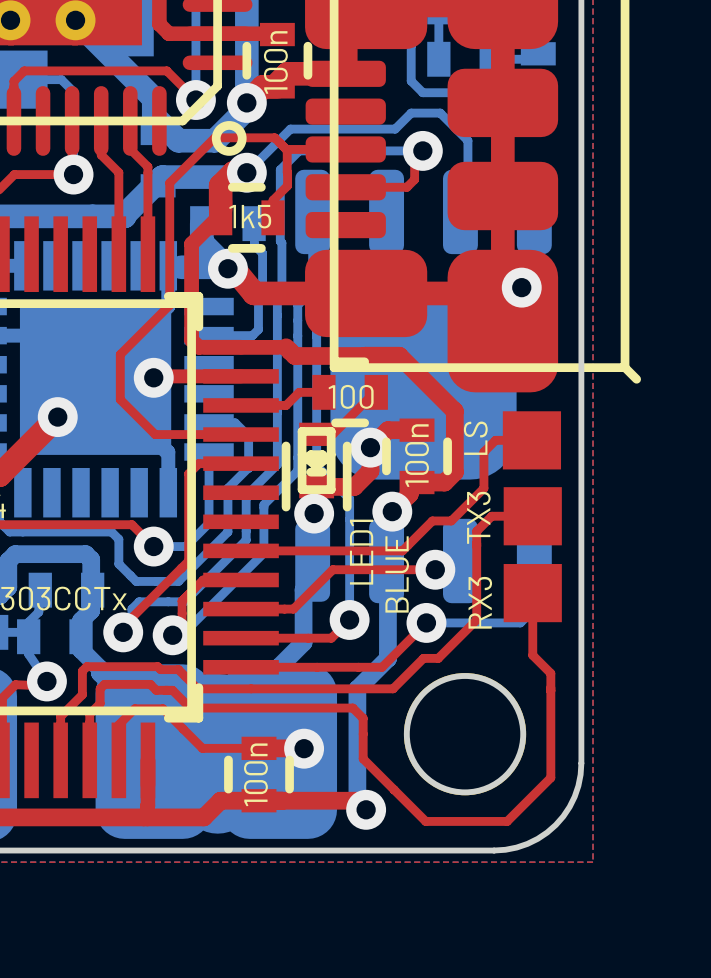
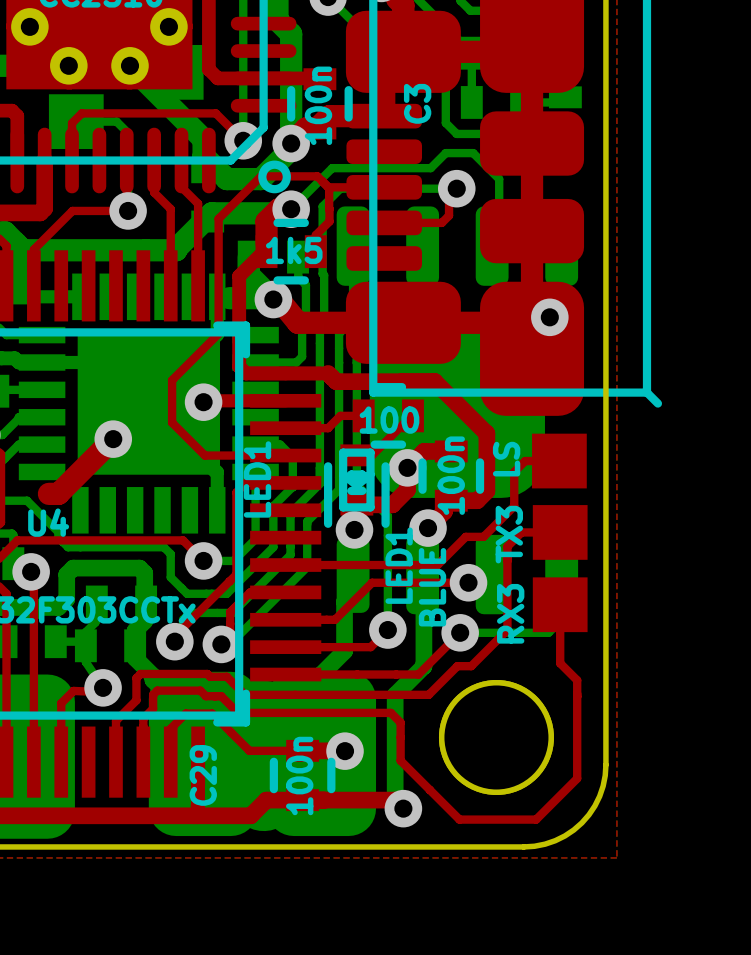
C3 name: none -> C3 (417, 103)
LED1 name: none -> LED1 (257, 479)
C29 name: none -> C29 (203, 775)

